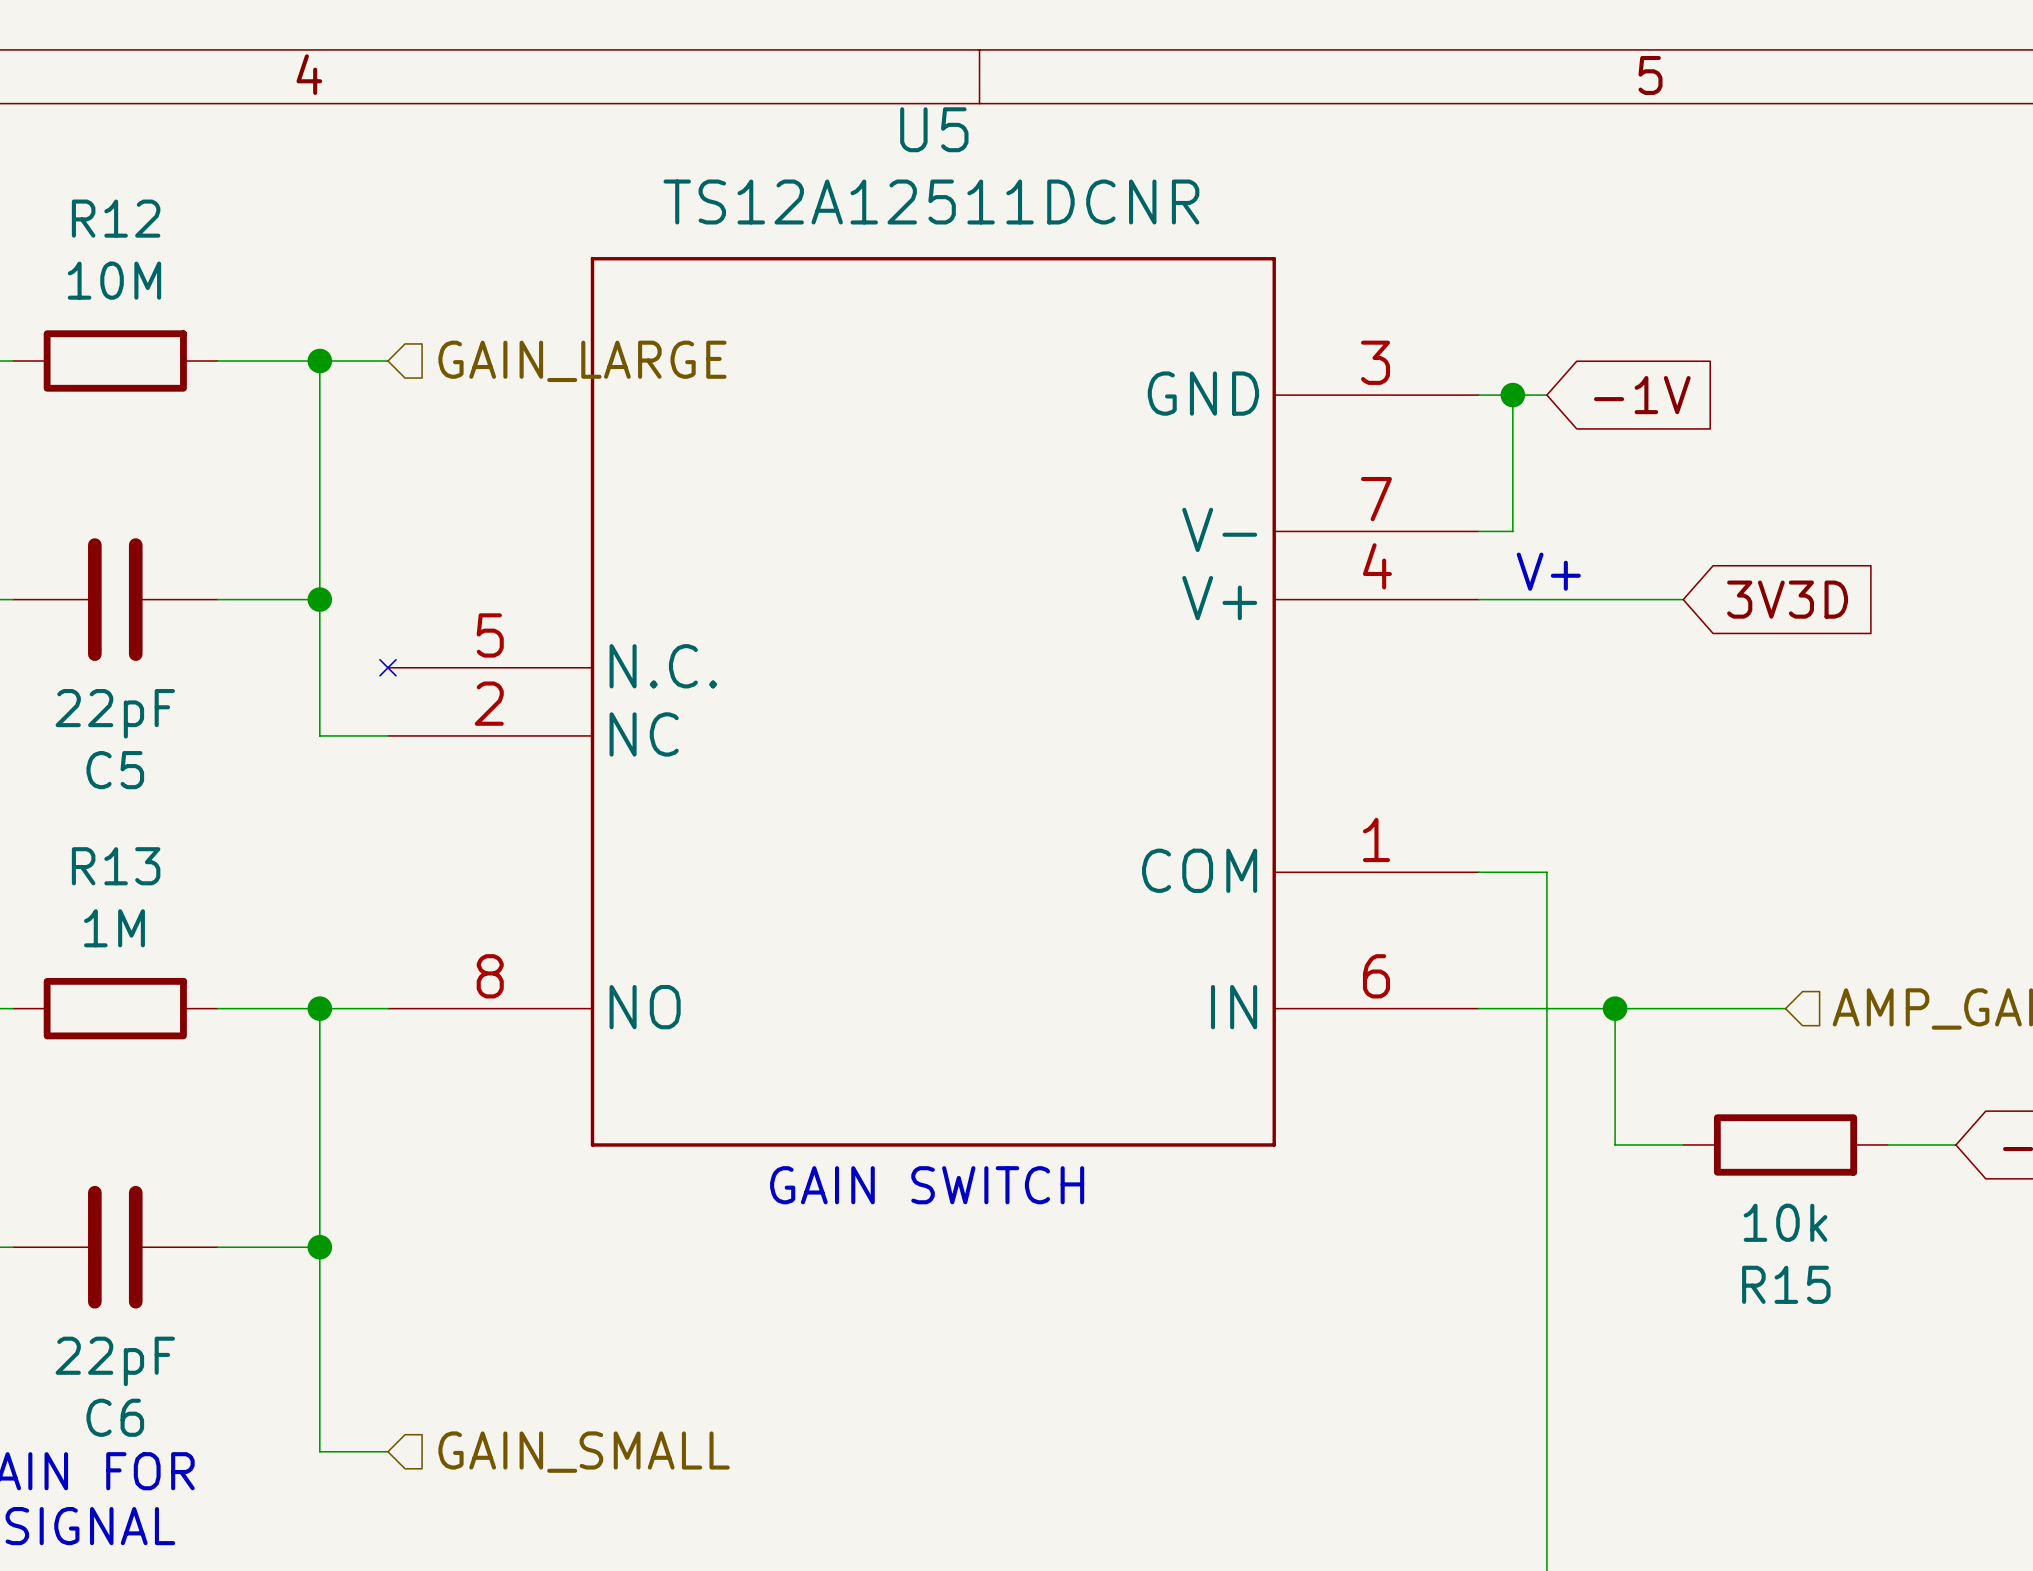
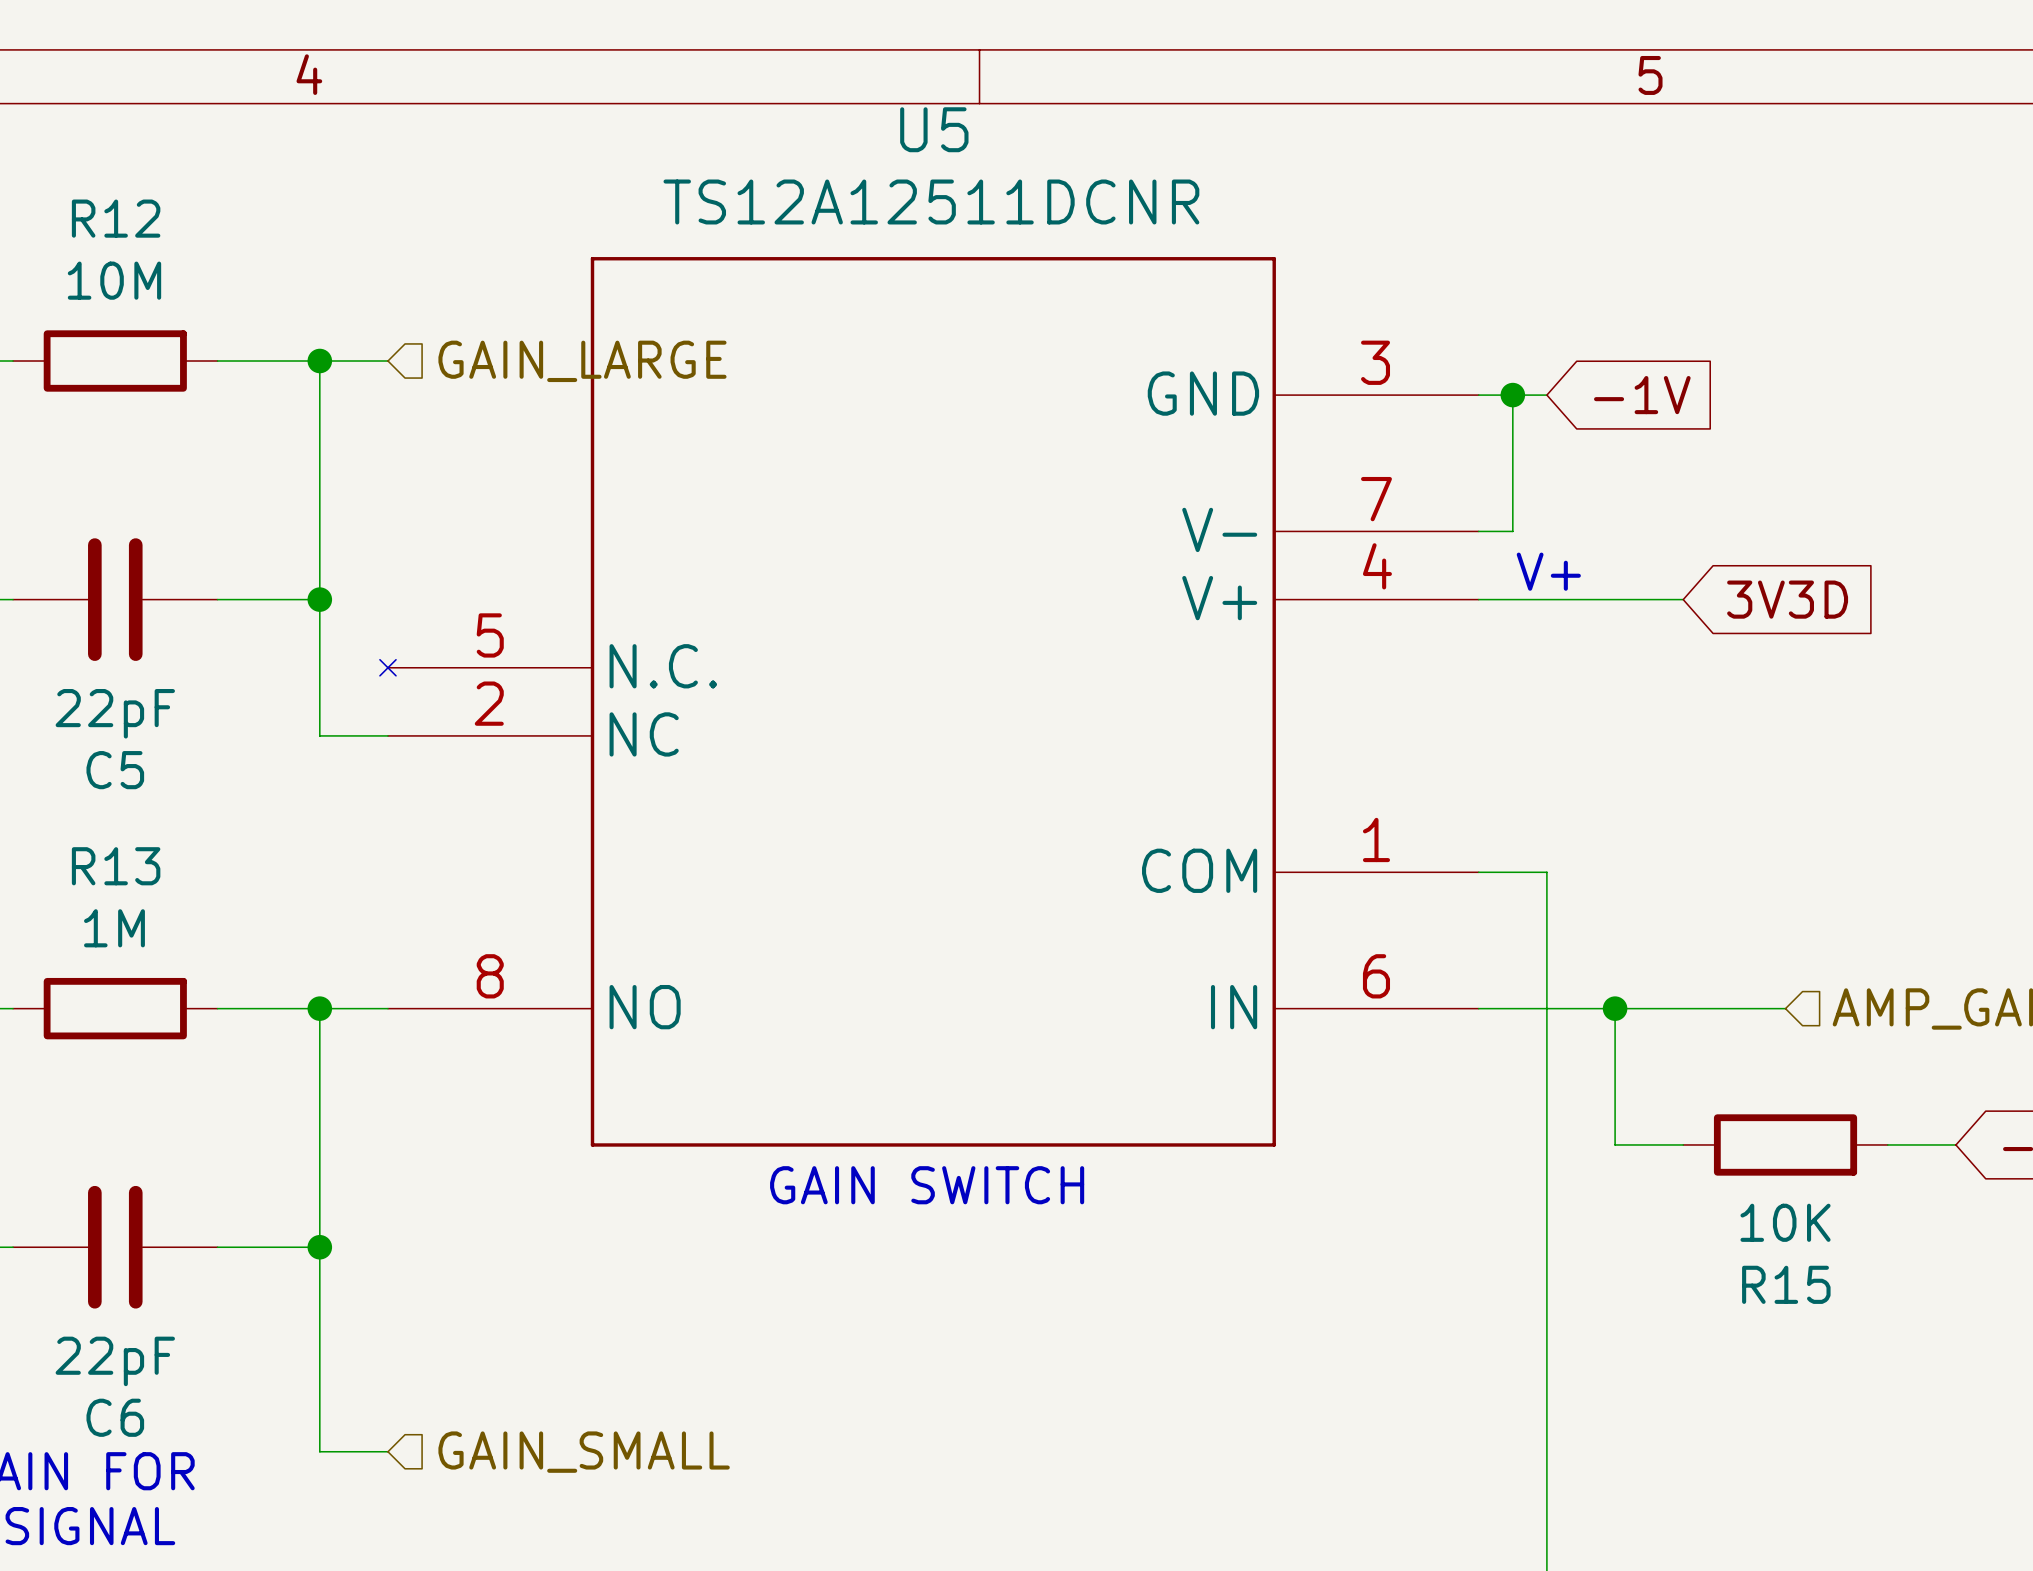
R15 value: 10k (1785, 1222) -> 10K (1785, 1222)

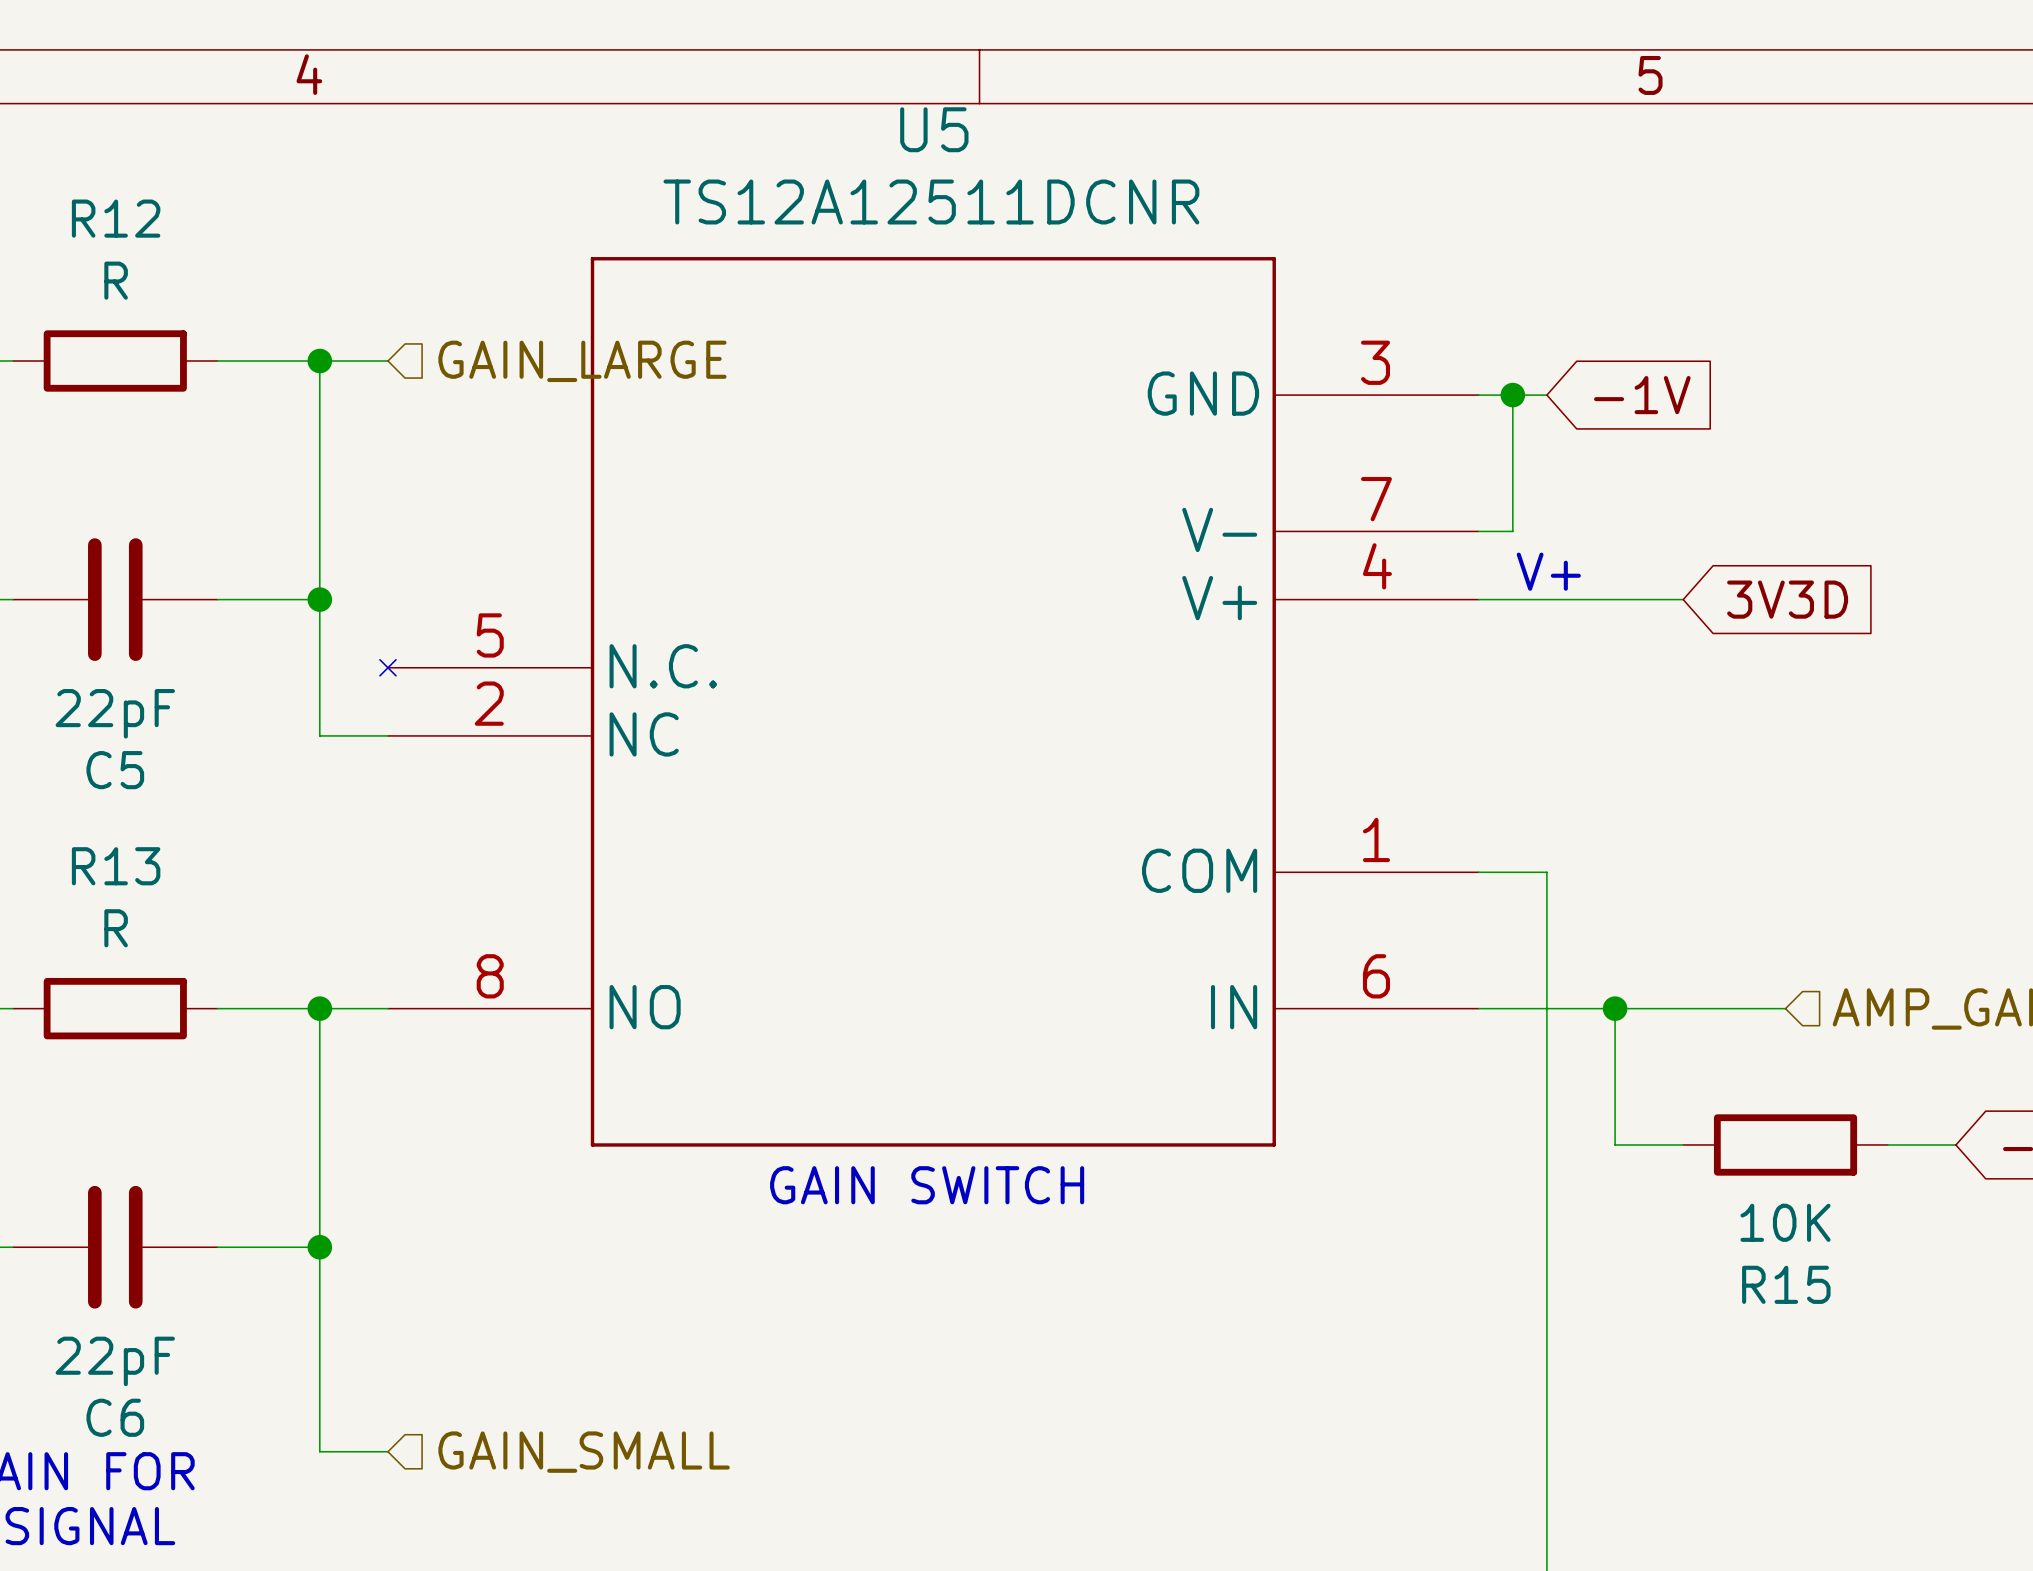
R12 value: 10M (114, 280) -> R (116, 280)
R13 value: 1M (114, 928) -> R (116, 928)

